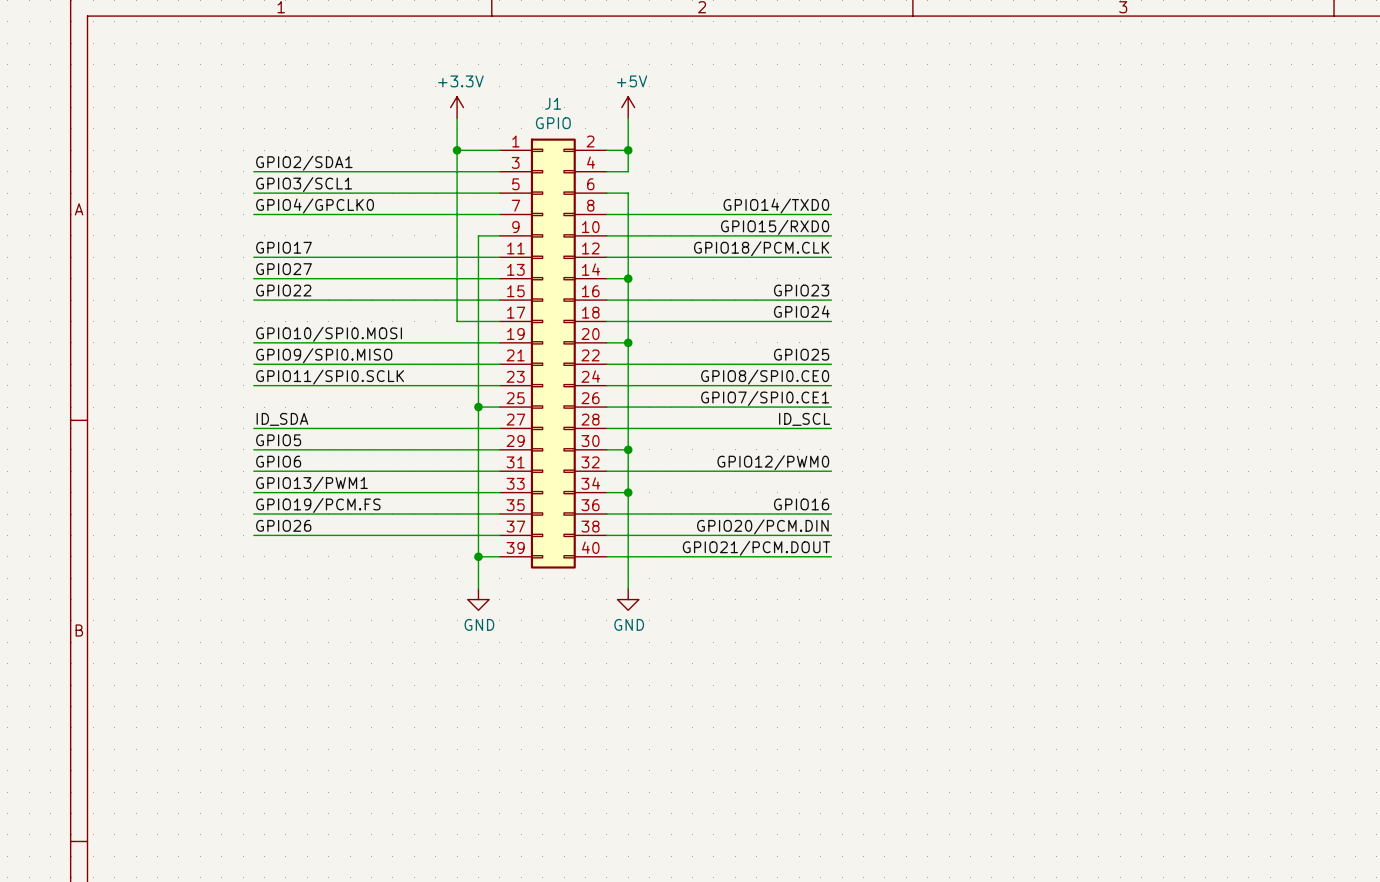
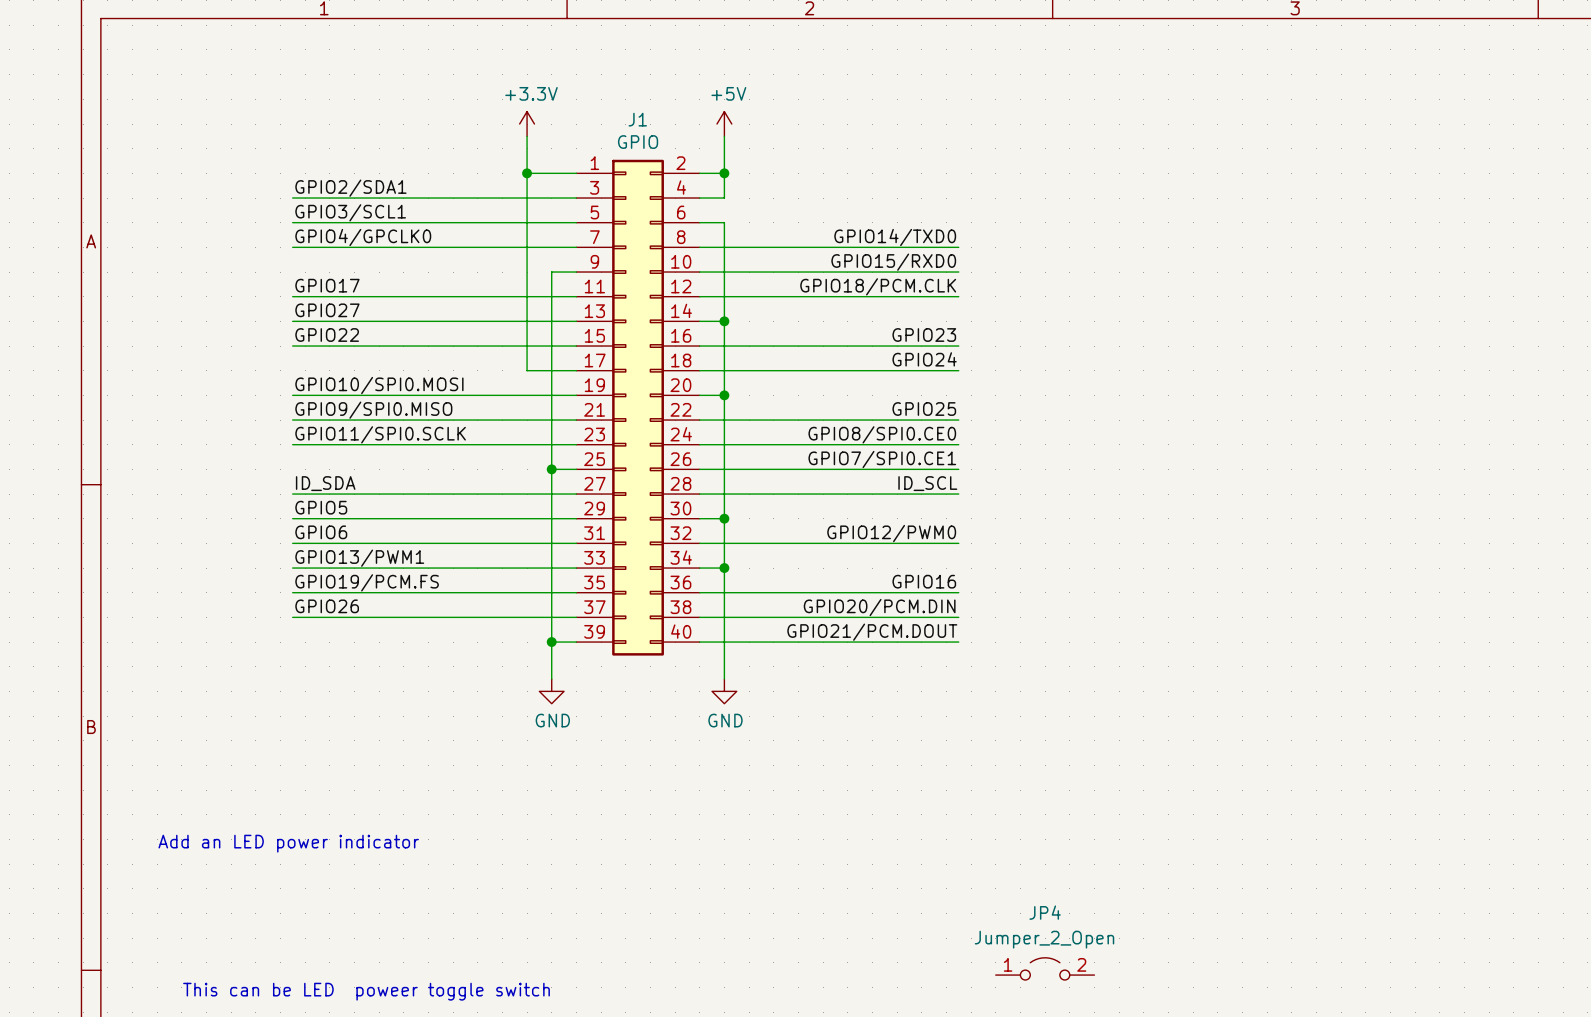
text: none -> Add an LED power indicator (288, 843)
JP4: none -> Jumper_2_Open (1045, 968)
text: none -> This can be LED poweer toggle switch (366, 991)

